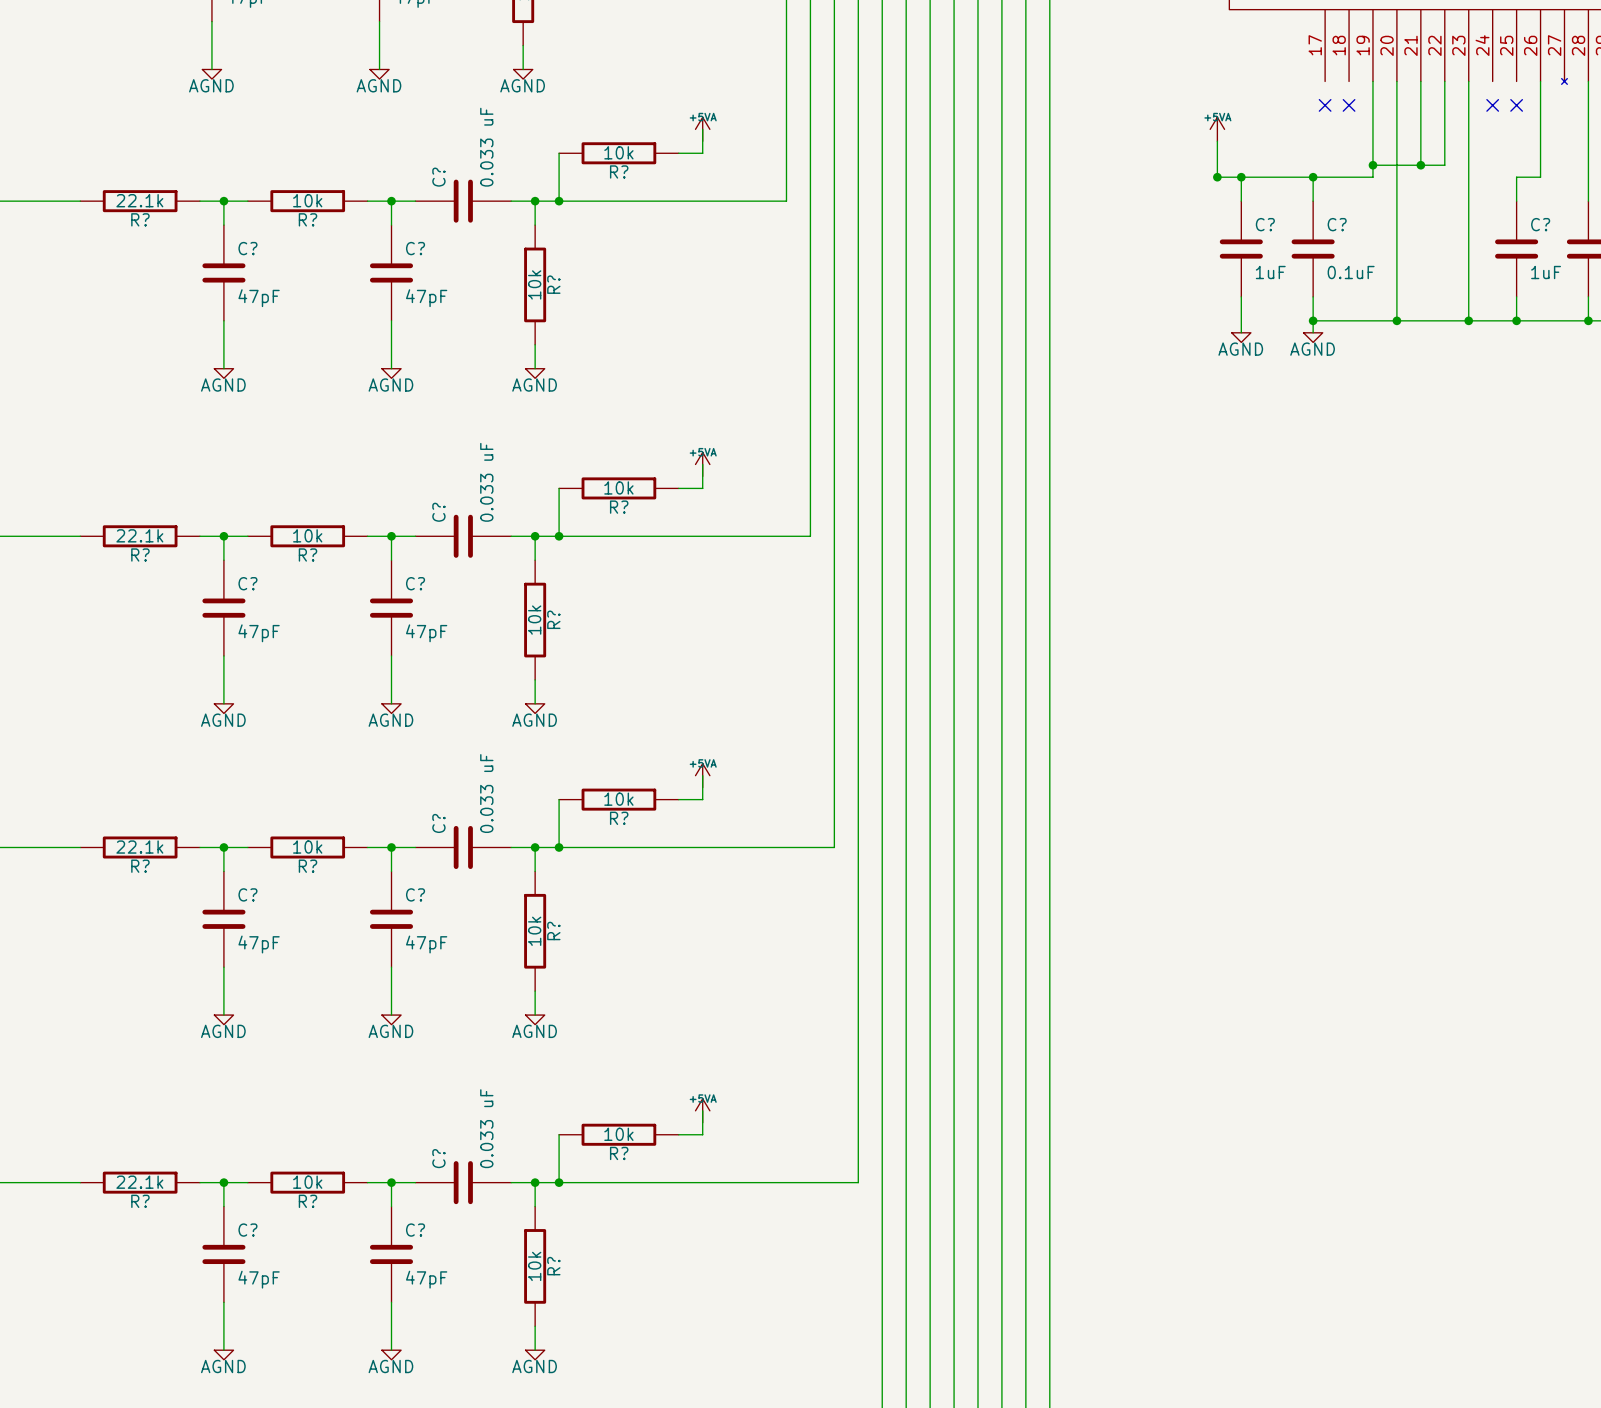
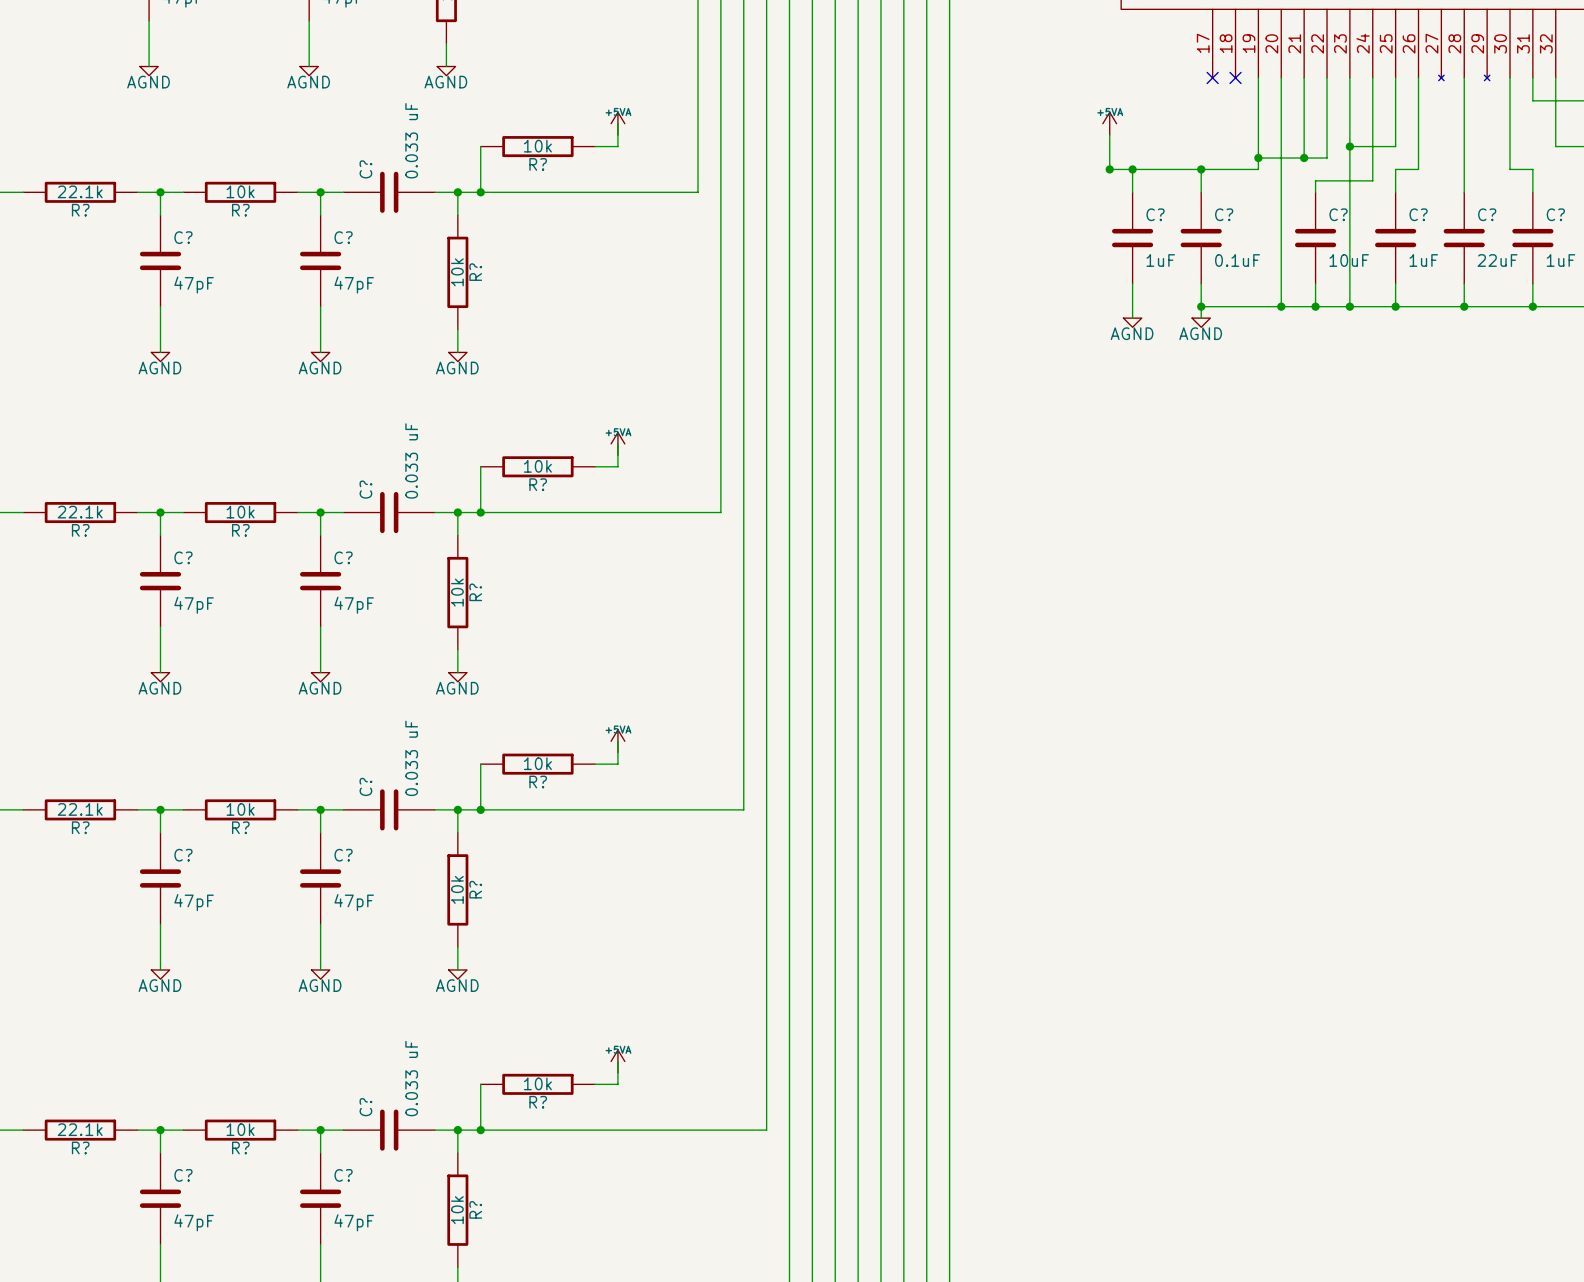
no-connect mark: none -> (1212, 77)
no-connect mark: none -> (1235, 77)
wire: none -> (1372, 77) (1372, 180) (1315, 180) (1315, 192)
wire: none -> (1395, 77) (1395, 146) (1349, 146)
no-connect mark: (1325, 105) -> none
no-connect mark: (1349, 105) -> none
no-connect mark: (1492, 105) -> none
no-connect mark: (1516, 105) -> none
junction: none -> (1349, 146)
C?: none -> 10uF (1315, 238)
wire: none -> (1315, 283) (1315, 306)
junction: none -> (1315, 306)

